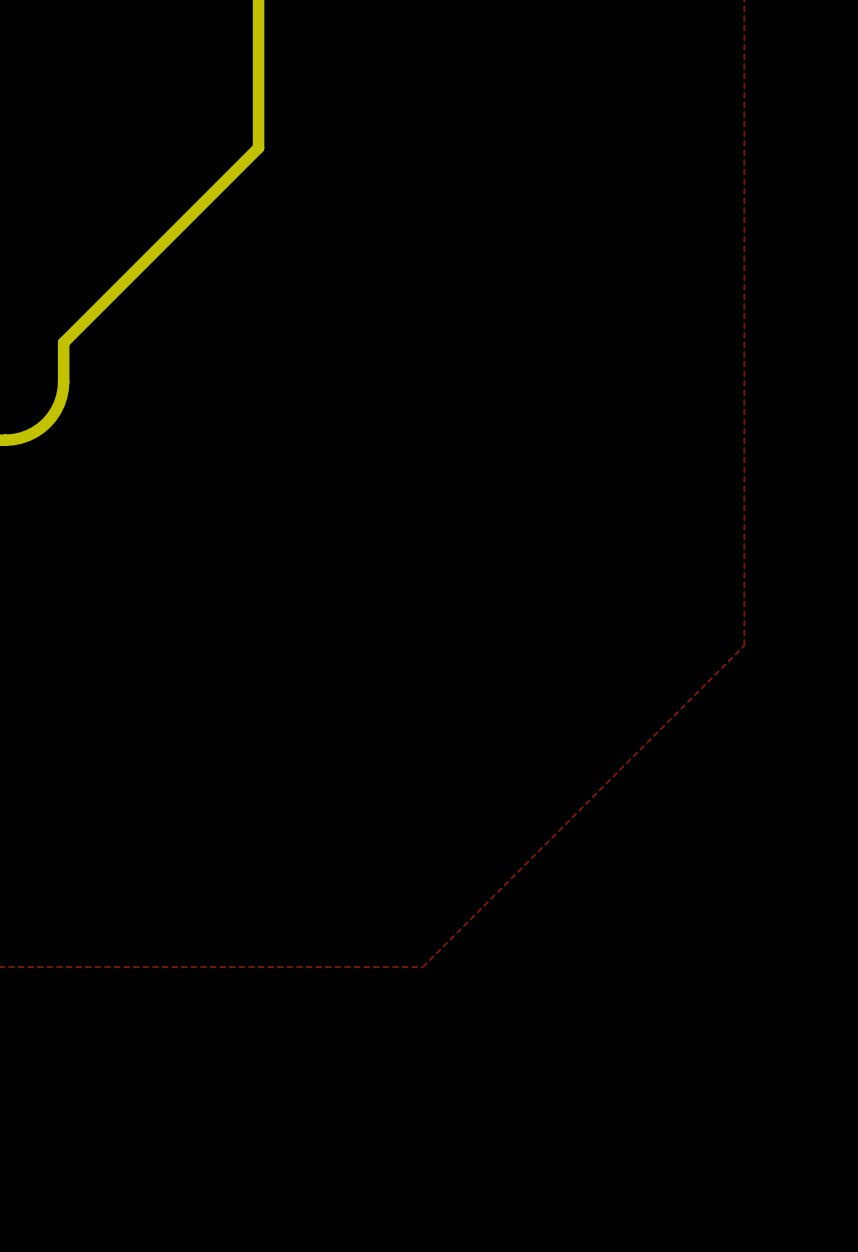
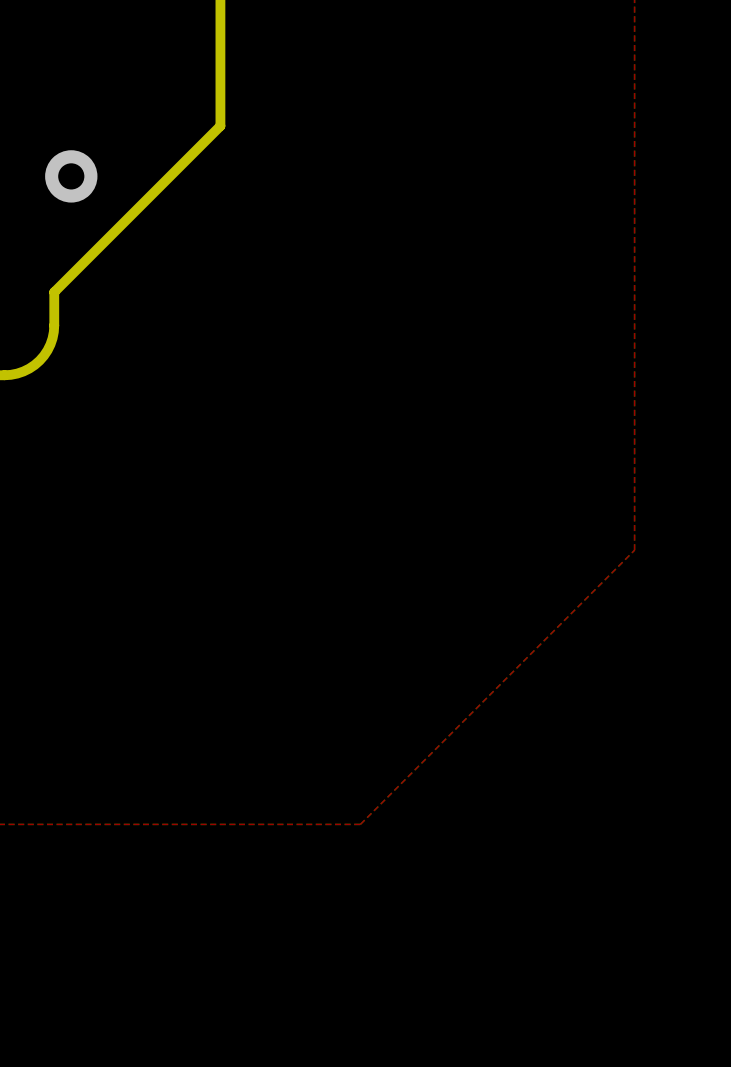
via: none -> (71, 176)

